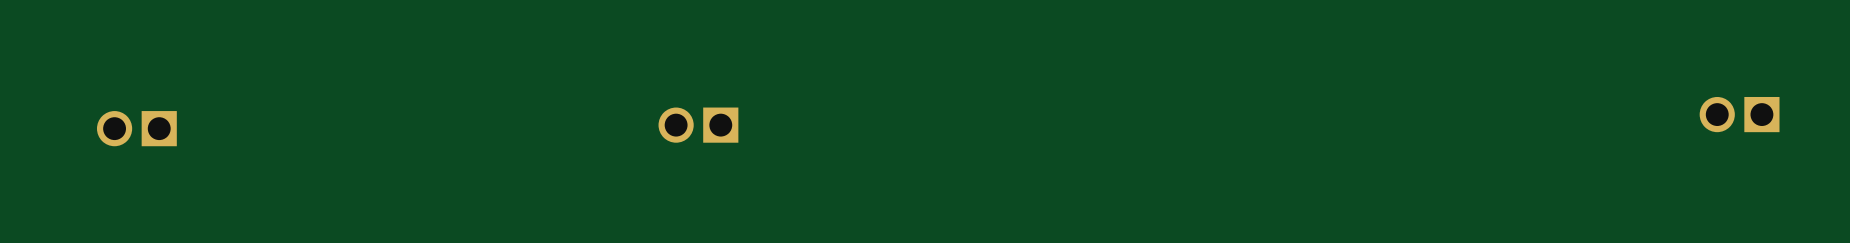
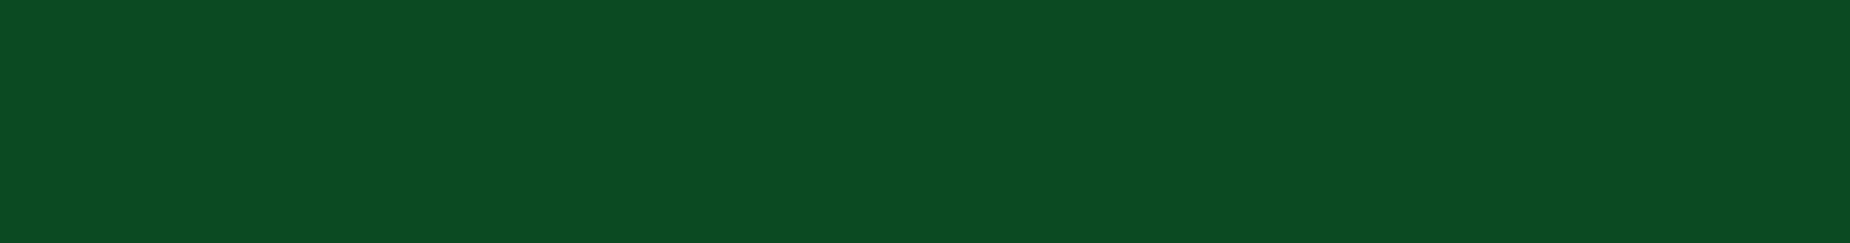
part: (1739, 114) -> none
part: (698, 125) -> none
part: (136, 128) -> none

